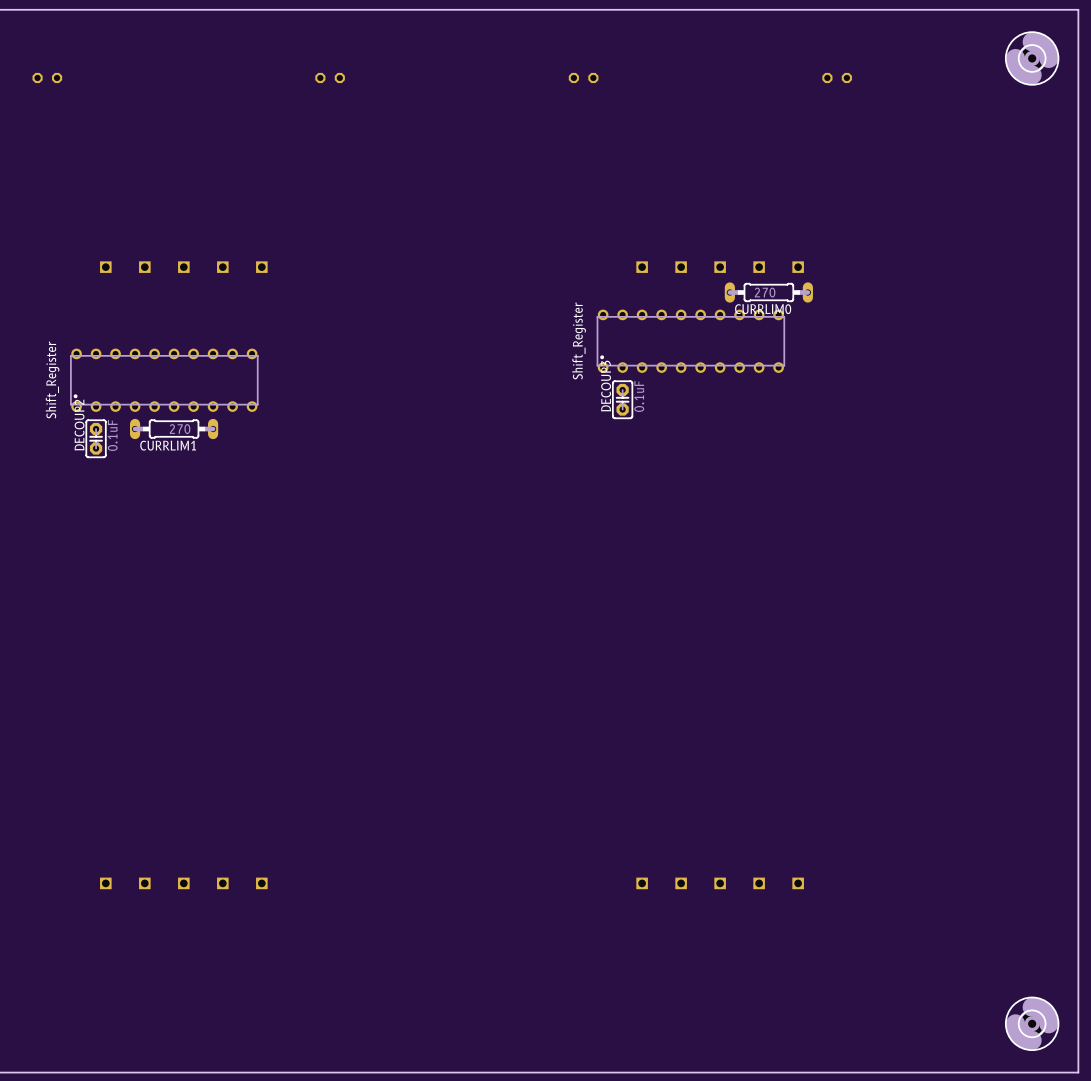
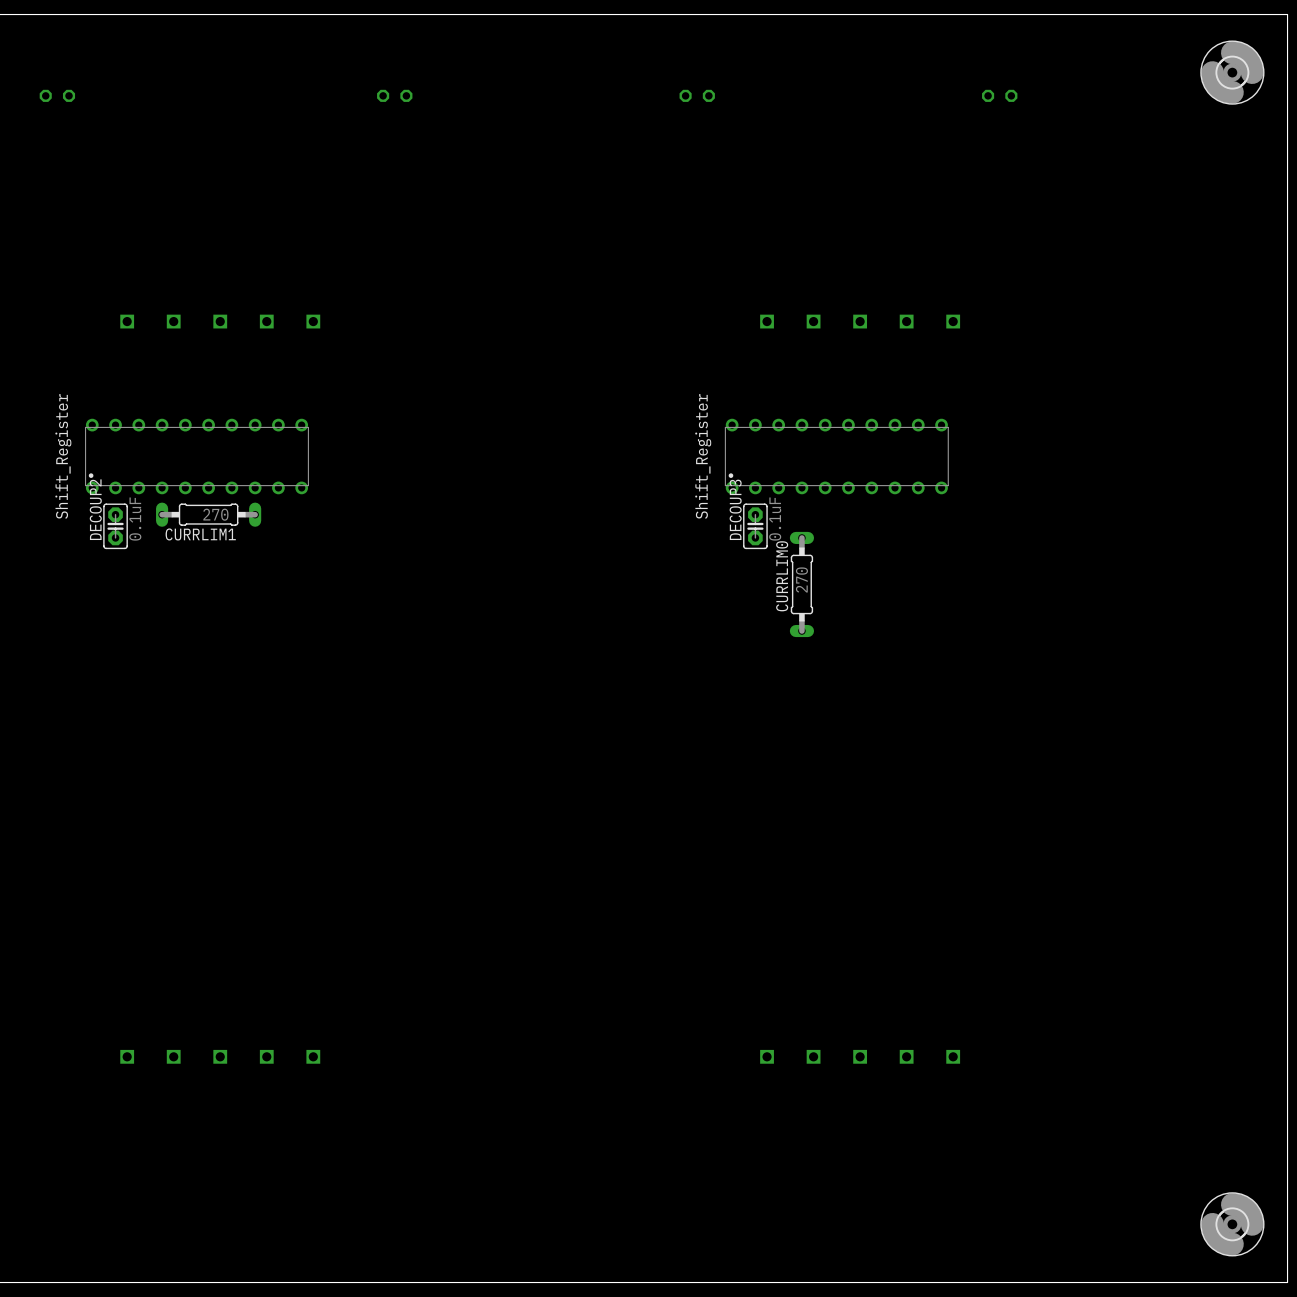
CURRLIM0 rotation: 0° (768, 292) -> 90° clockwise (801, 584)
CURRLIM0 position: (768, 292) -> (801, 584)
part position: (690, 341) -> (836, 456)
DECOUP3 position: (622, 399) -> (755, 526)

